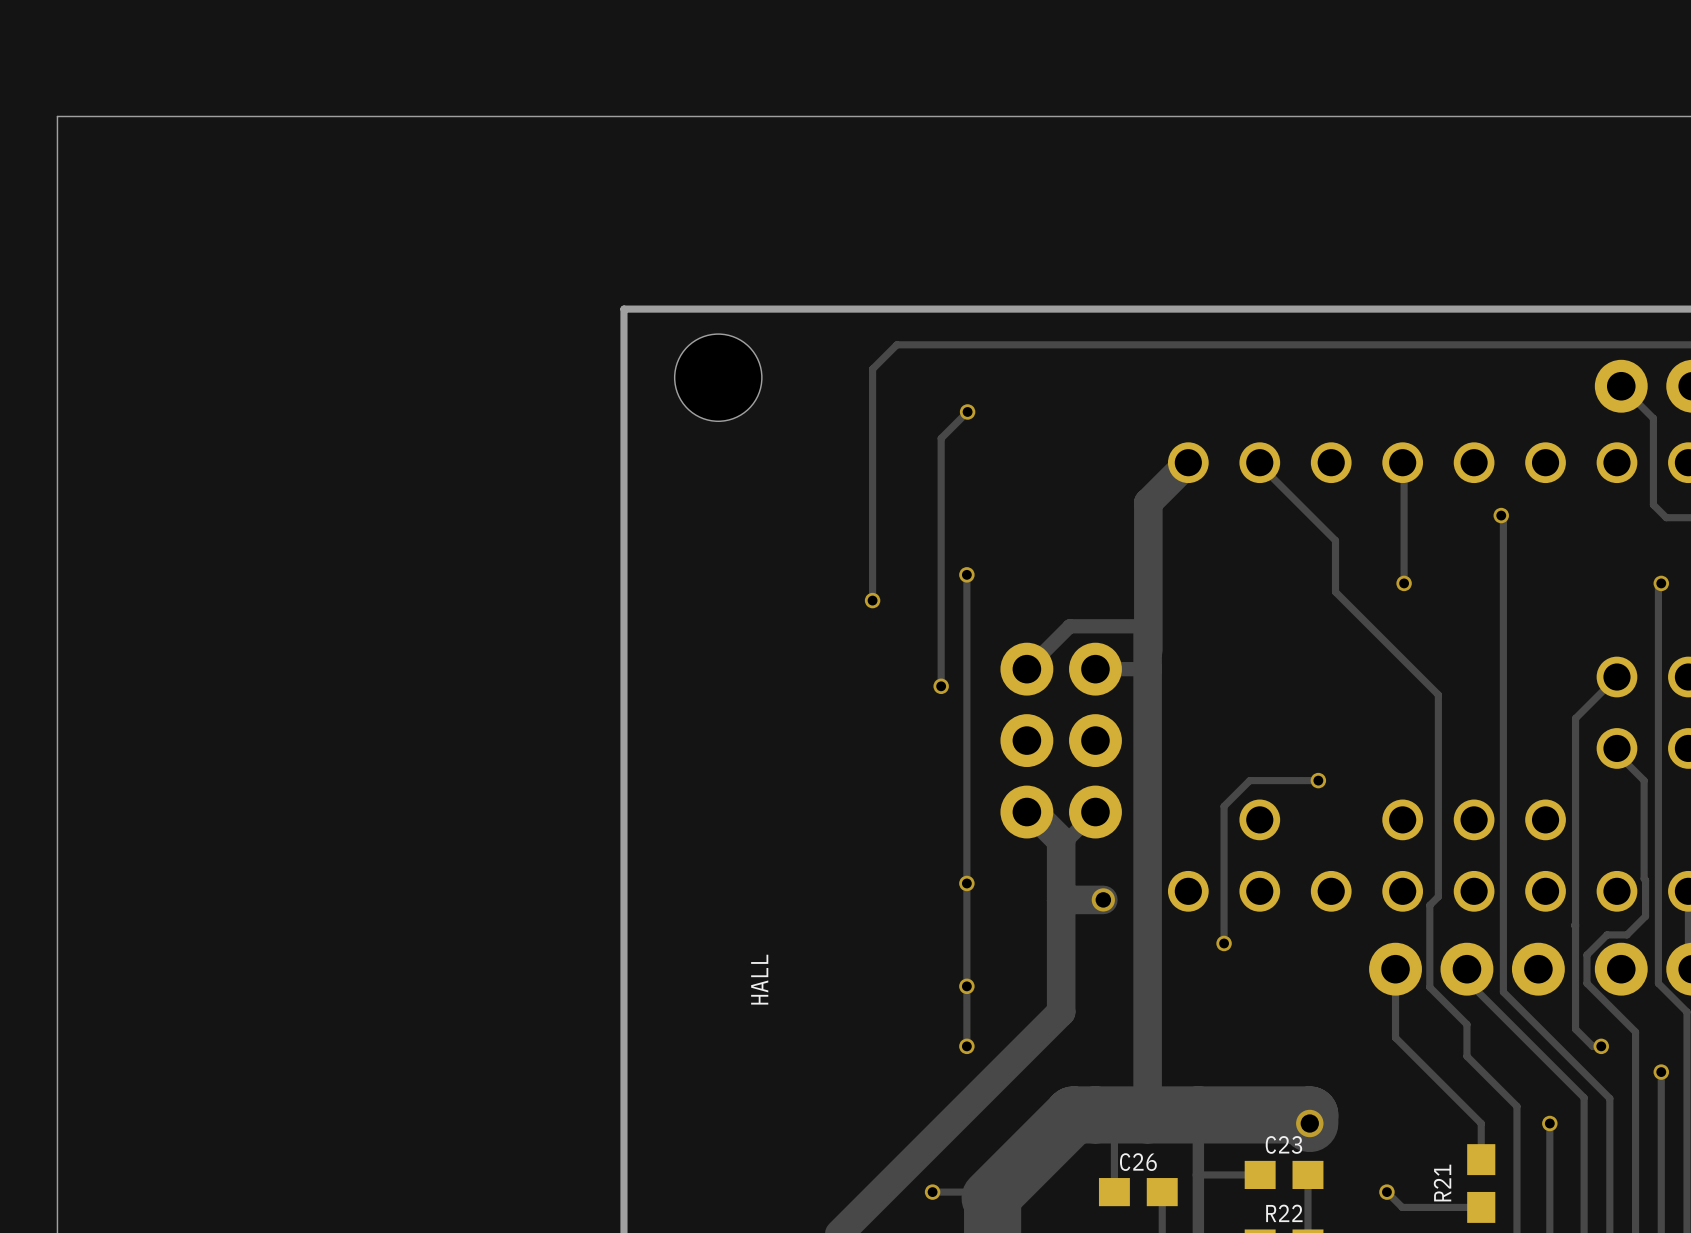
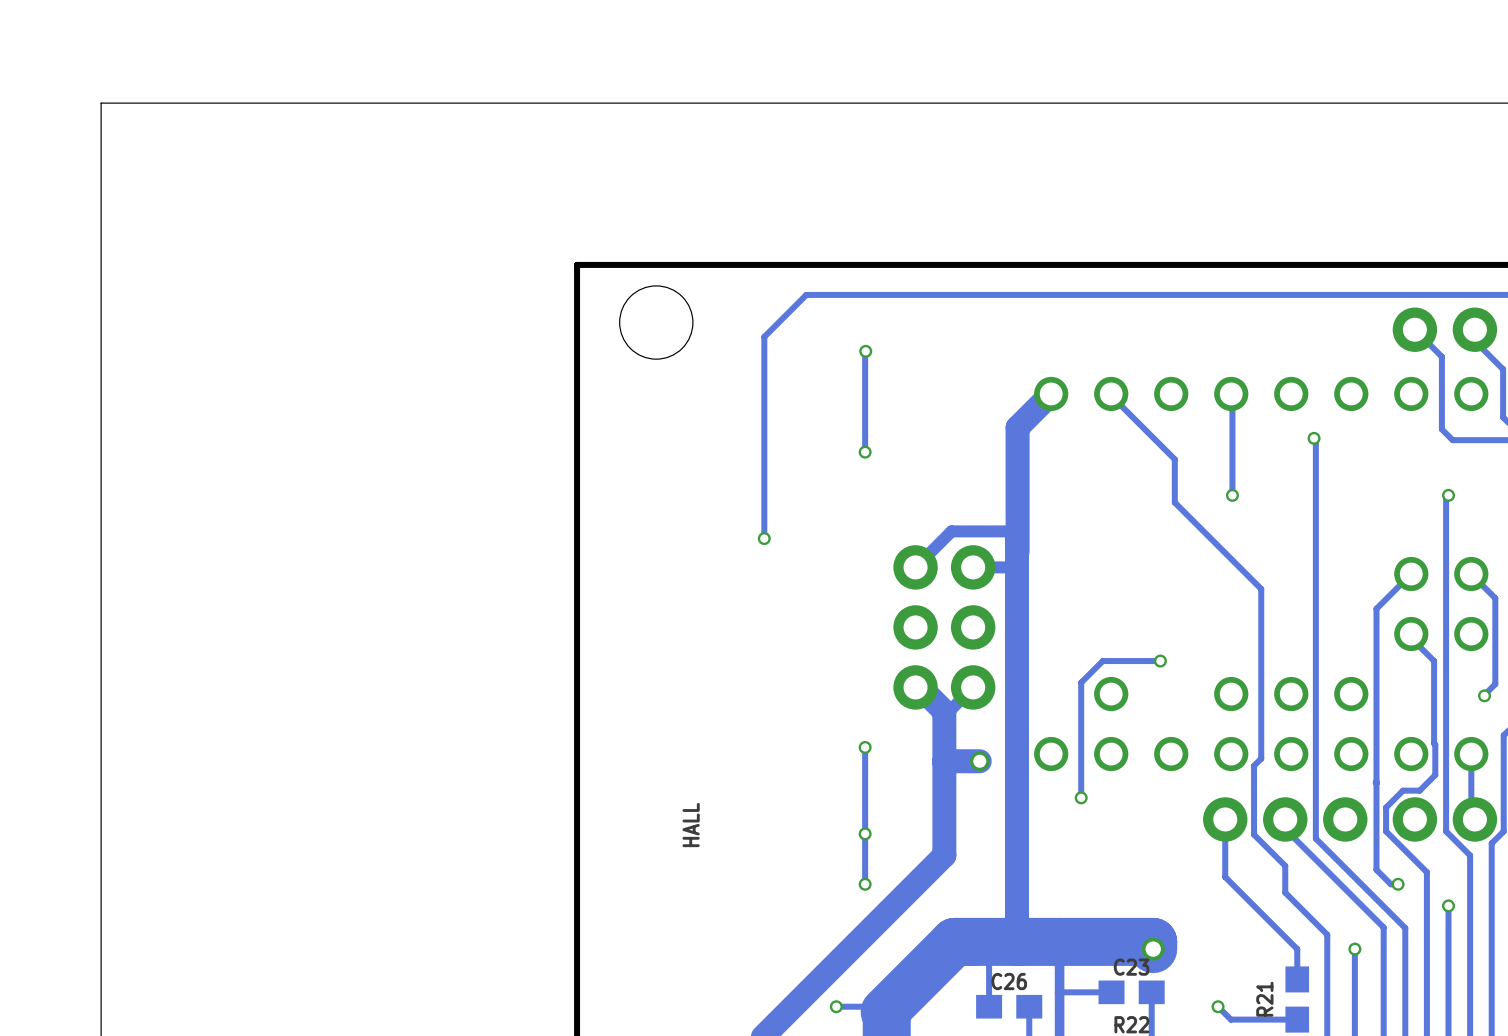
track: (872, 369) (872, 600) -> (785, 315) (764, 336) (764, 538)
track: (966, 412) (941, 438) (941, 686) -> (865, 351) (865, 452)
track: (966, 574) (966, 883) -> none
via position: (966, 574) -> (865, 452)
via position: (872, 600) -> (764, 538)
via: (941, 686) -> none

